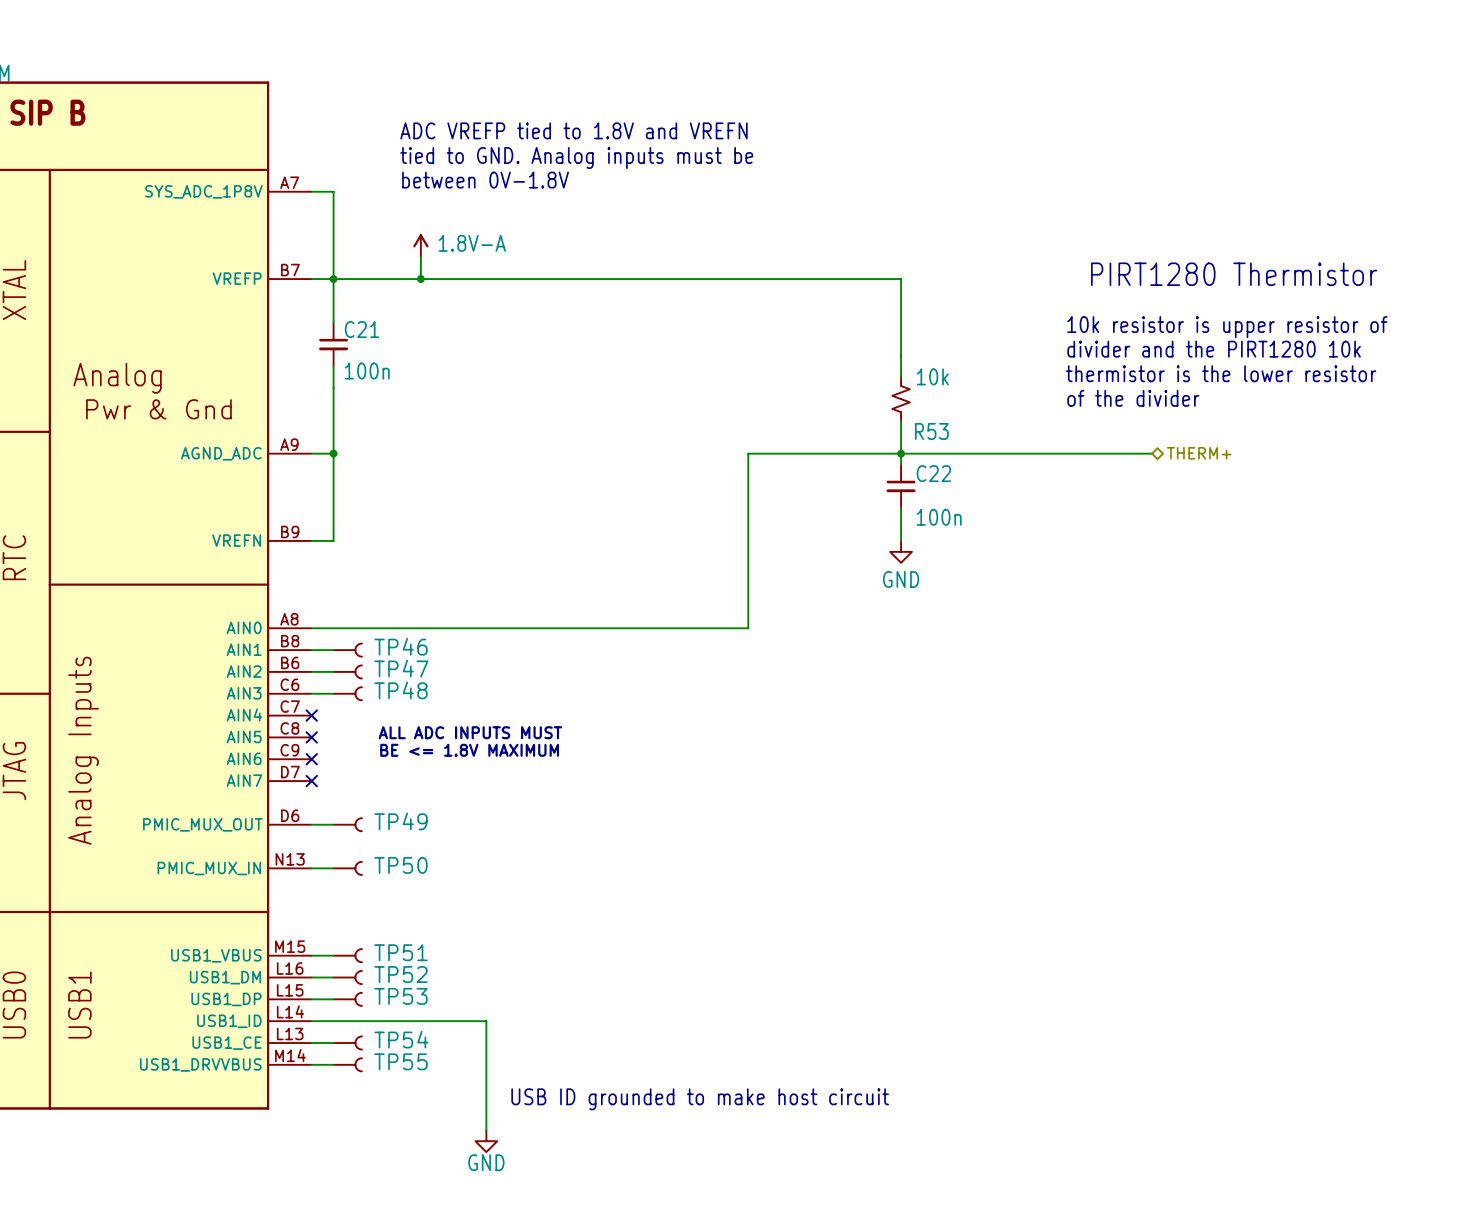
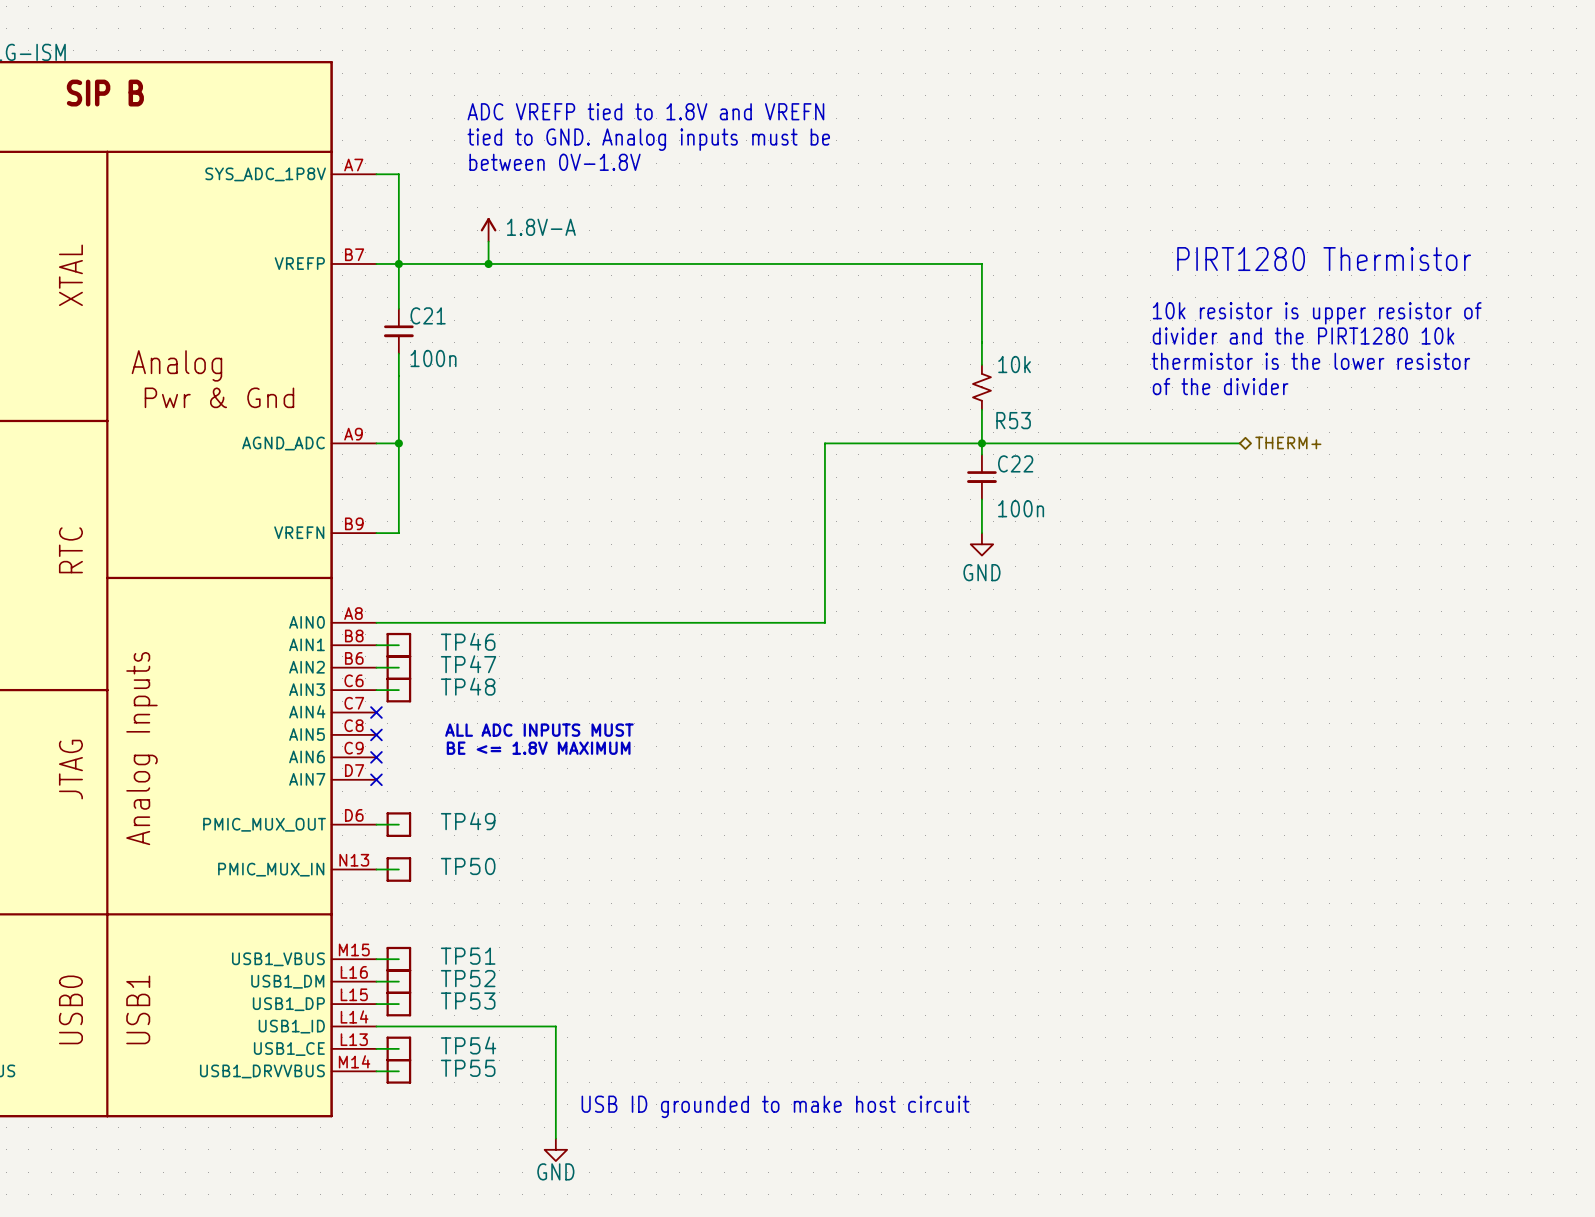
TP46 symbol: [332, 642, 363, 658] -> [386, 632, 412, 658]
TP47 symbol: [332, 664, 363, 680] -> [386, 655, 412, 680]
TP48 symbol: [332, 686, 363, 701] -> [386, 677, 412, 703]
TP49 symbol: [332, 817, 363, 832] -> [386, 812, 412, 837]
TP50 symbol: [332, 861, 363, 876] -> [386, 857, 412, 882]
TP51 symbol: [332, 948, 363, 963] -> [386, 946, 412, 972]
TP52 symbol: [332, 970, 363, 985] -> [386, 969, 412, 994]
TP53 symbol: [332, 992, 363, 1007] -> [386, 991, 412, 1017]
TP54 symbol: [332, 1035, 363, 1051] -> [386, 1036, 412, 1062]
TP55 symbol: [332, 1057, 363, 1073] -> [386, 1059, 412, 1084]

